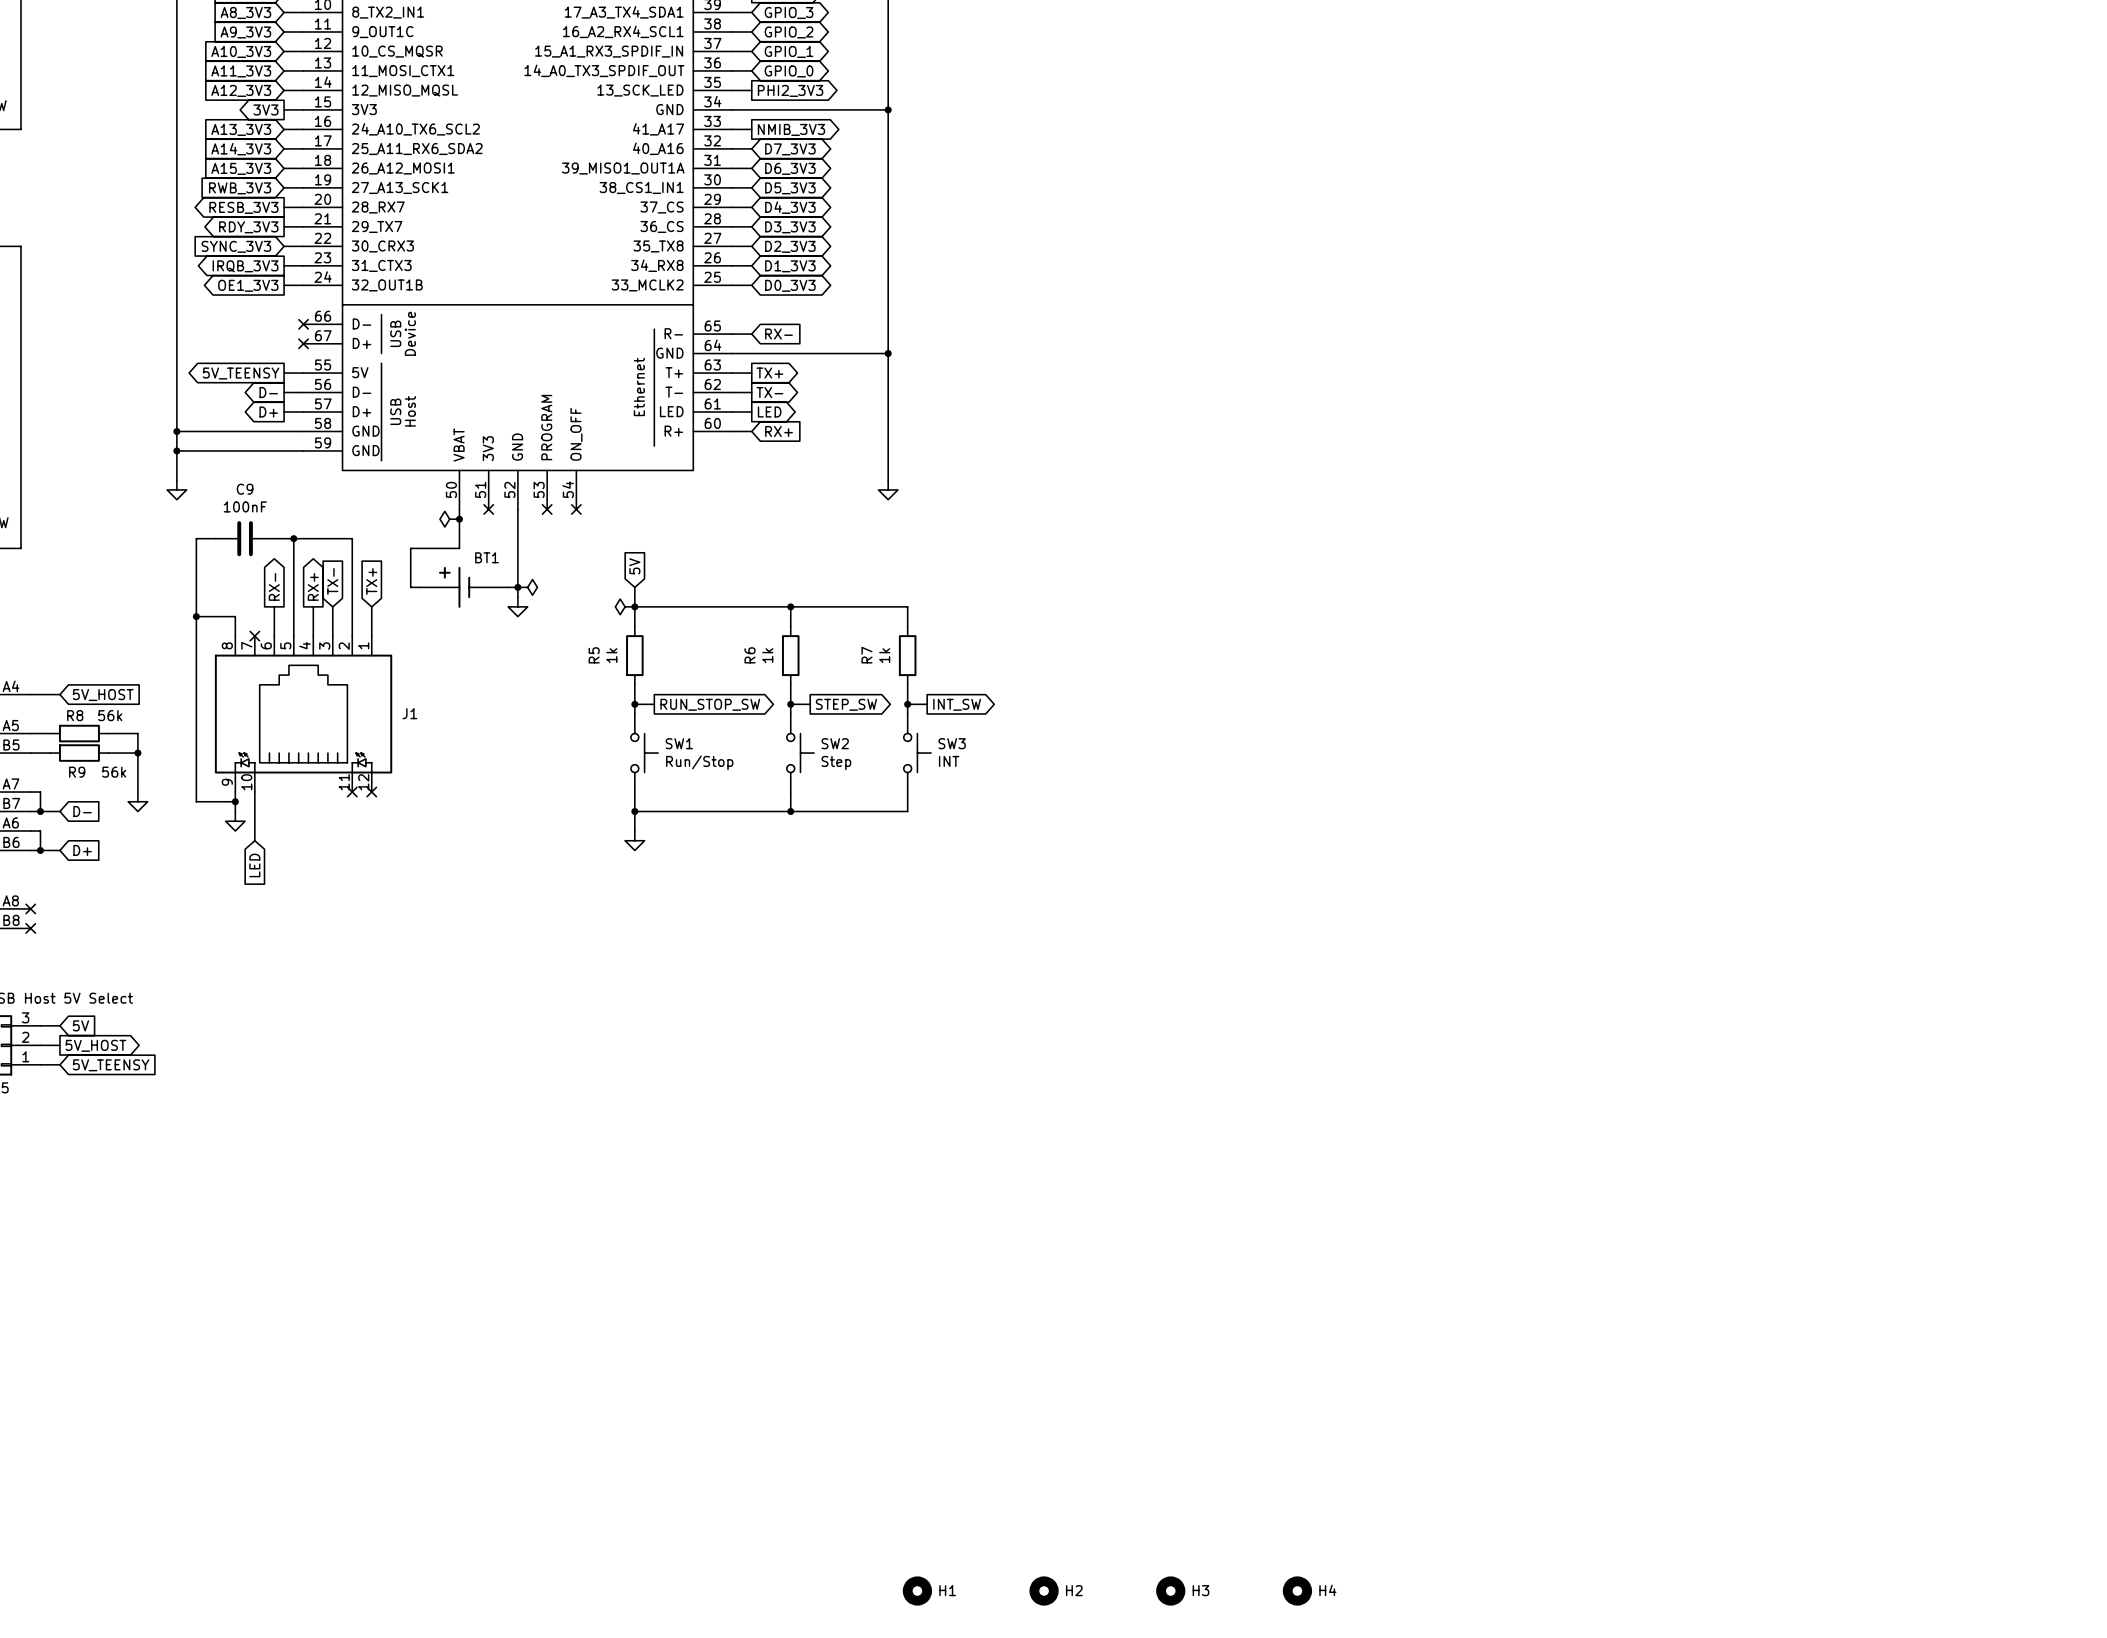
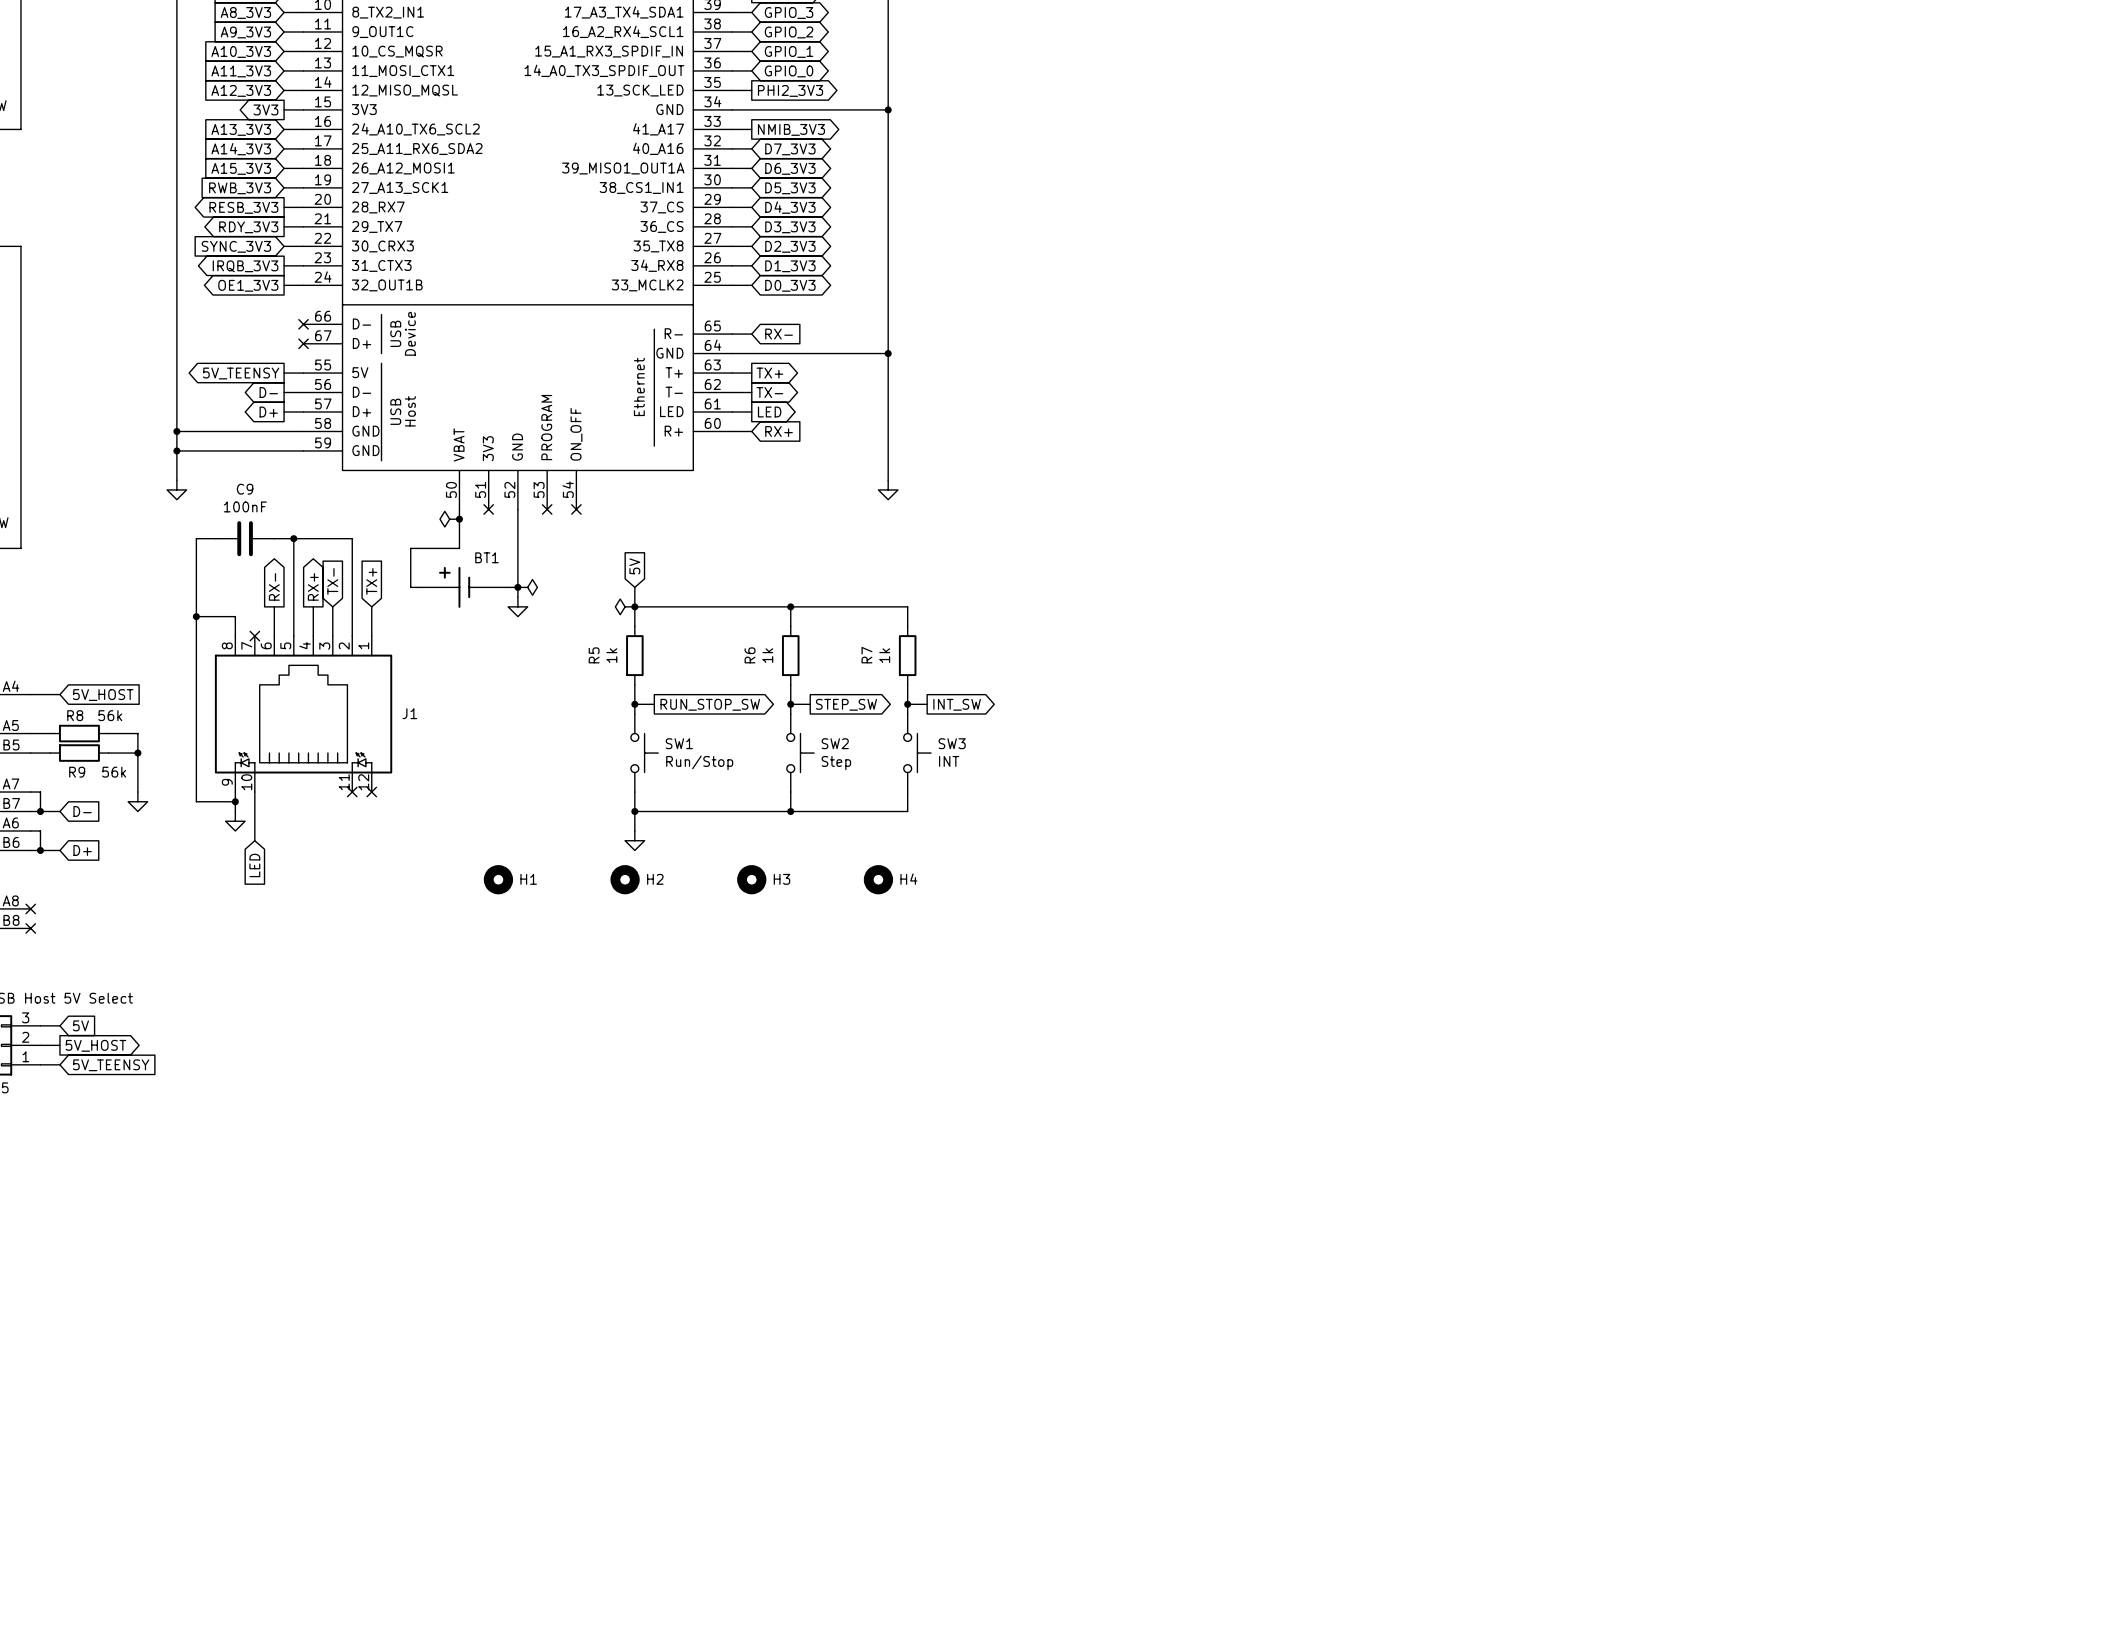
H1 position: (917, 1591) -> (498, 879)
H2 position: (1044, 1591) -> (625, 879)
H3 position: (1170, 1591) -> (751, 879)
H4 position: (1297, 1591) -> (878, 879)

